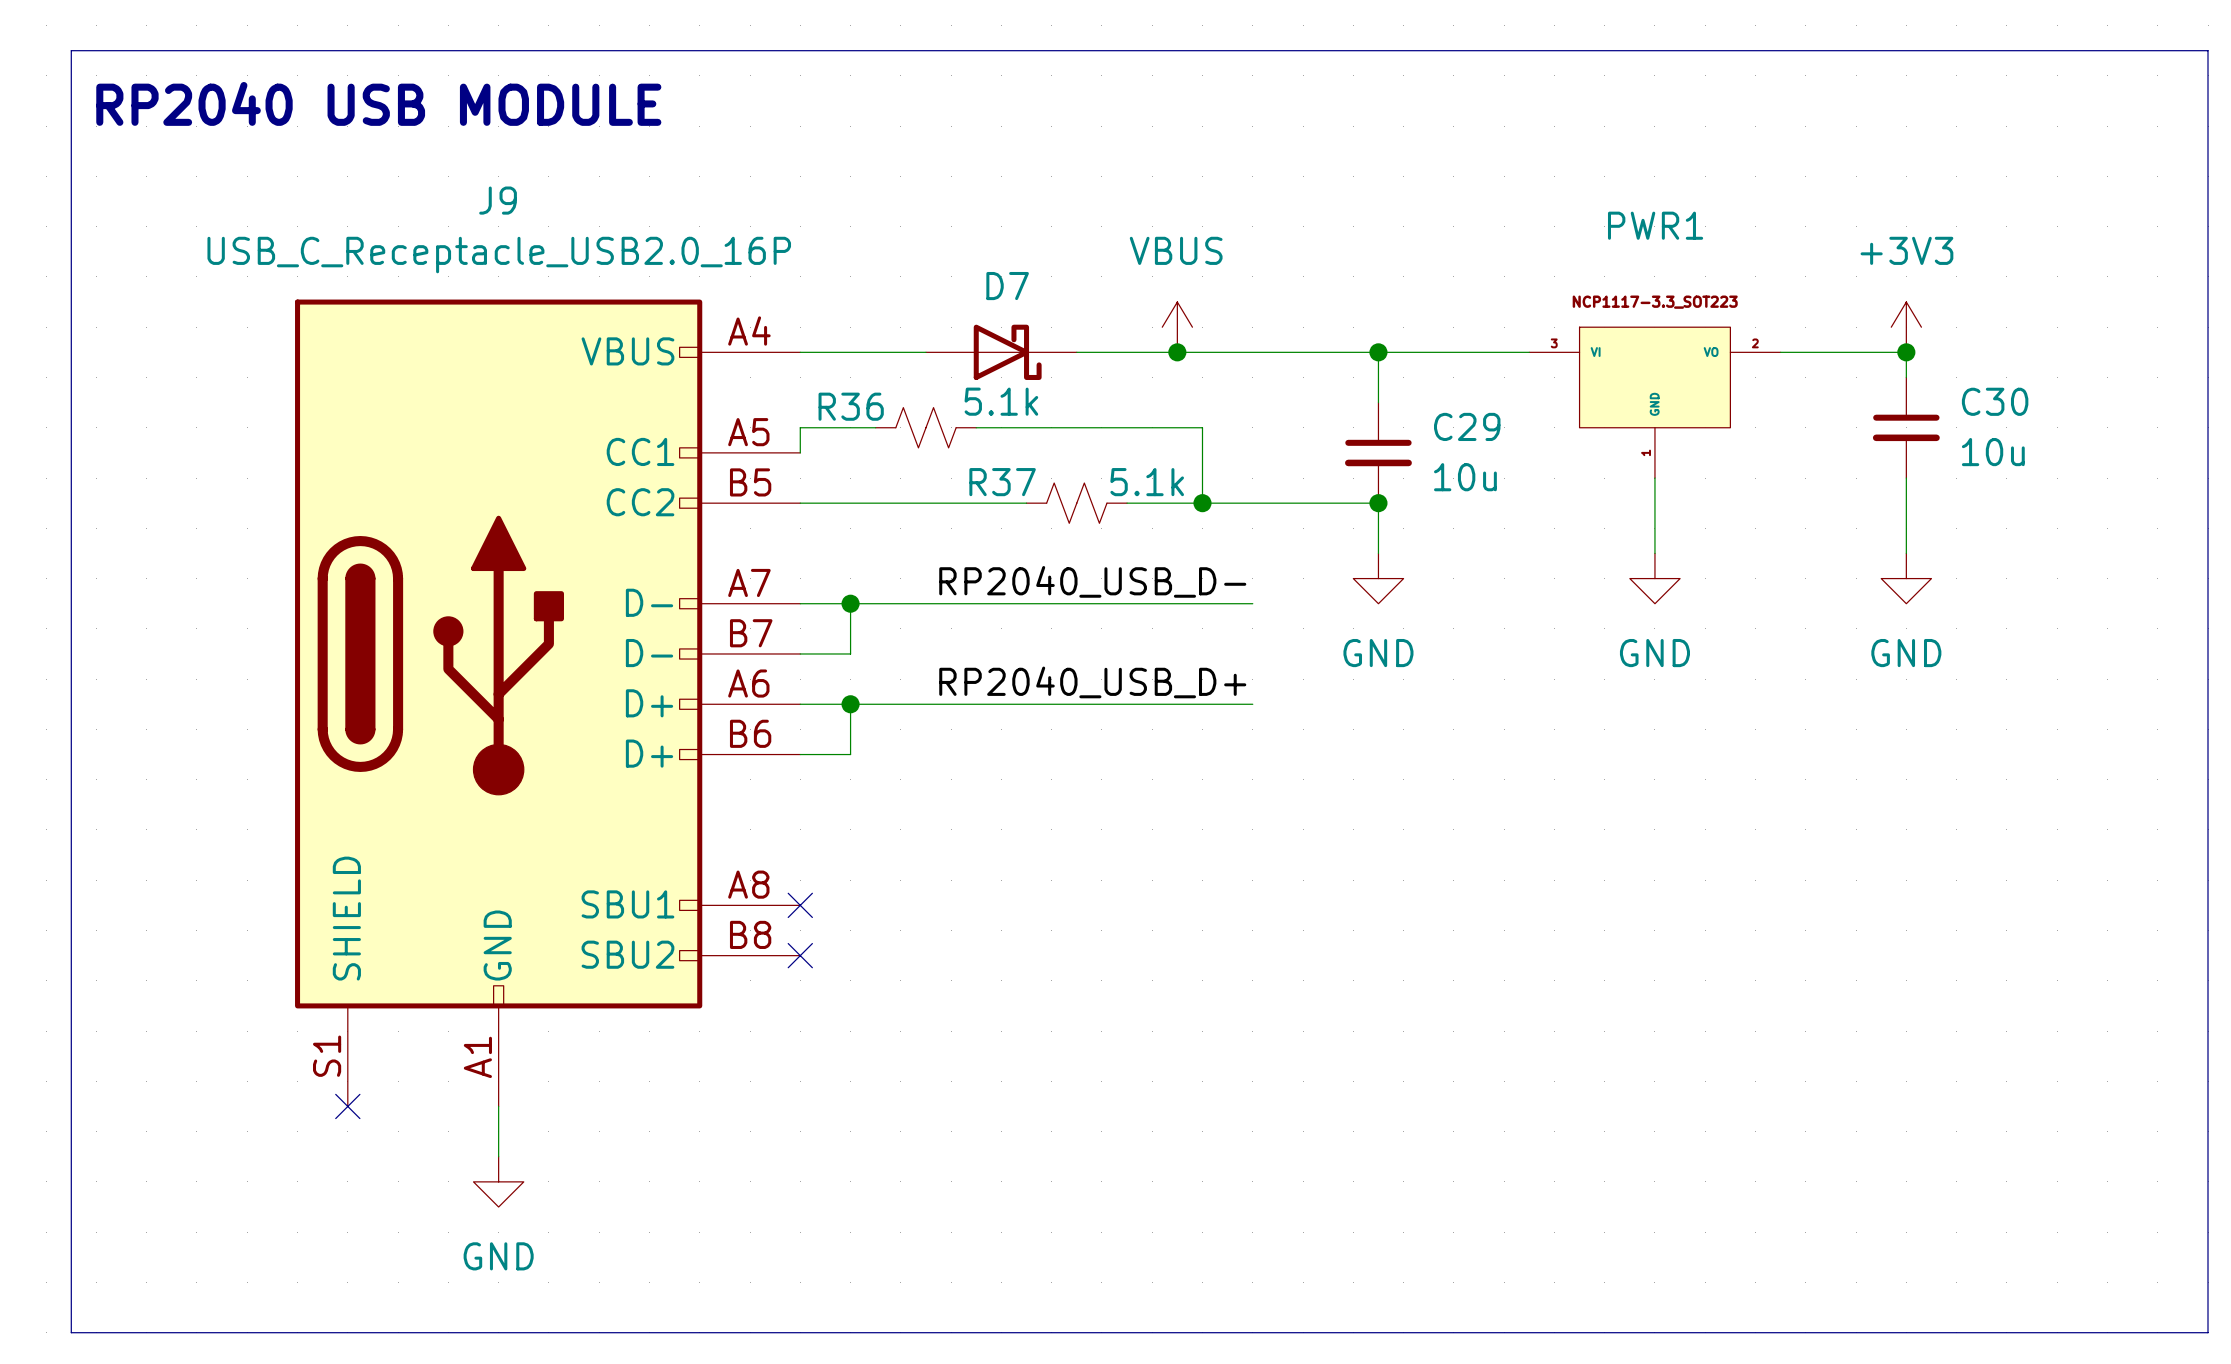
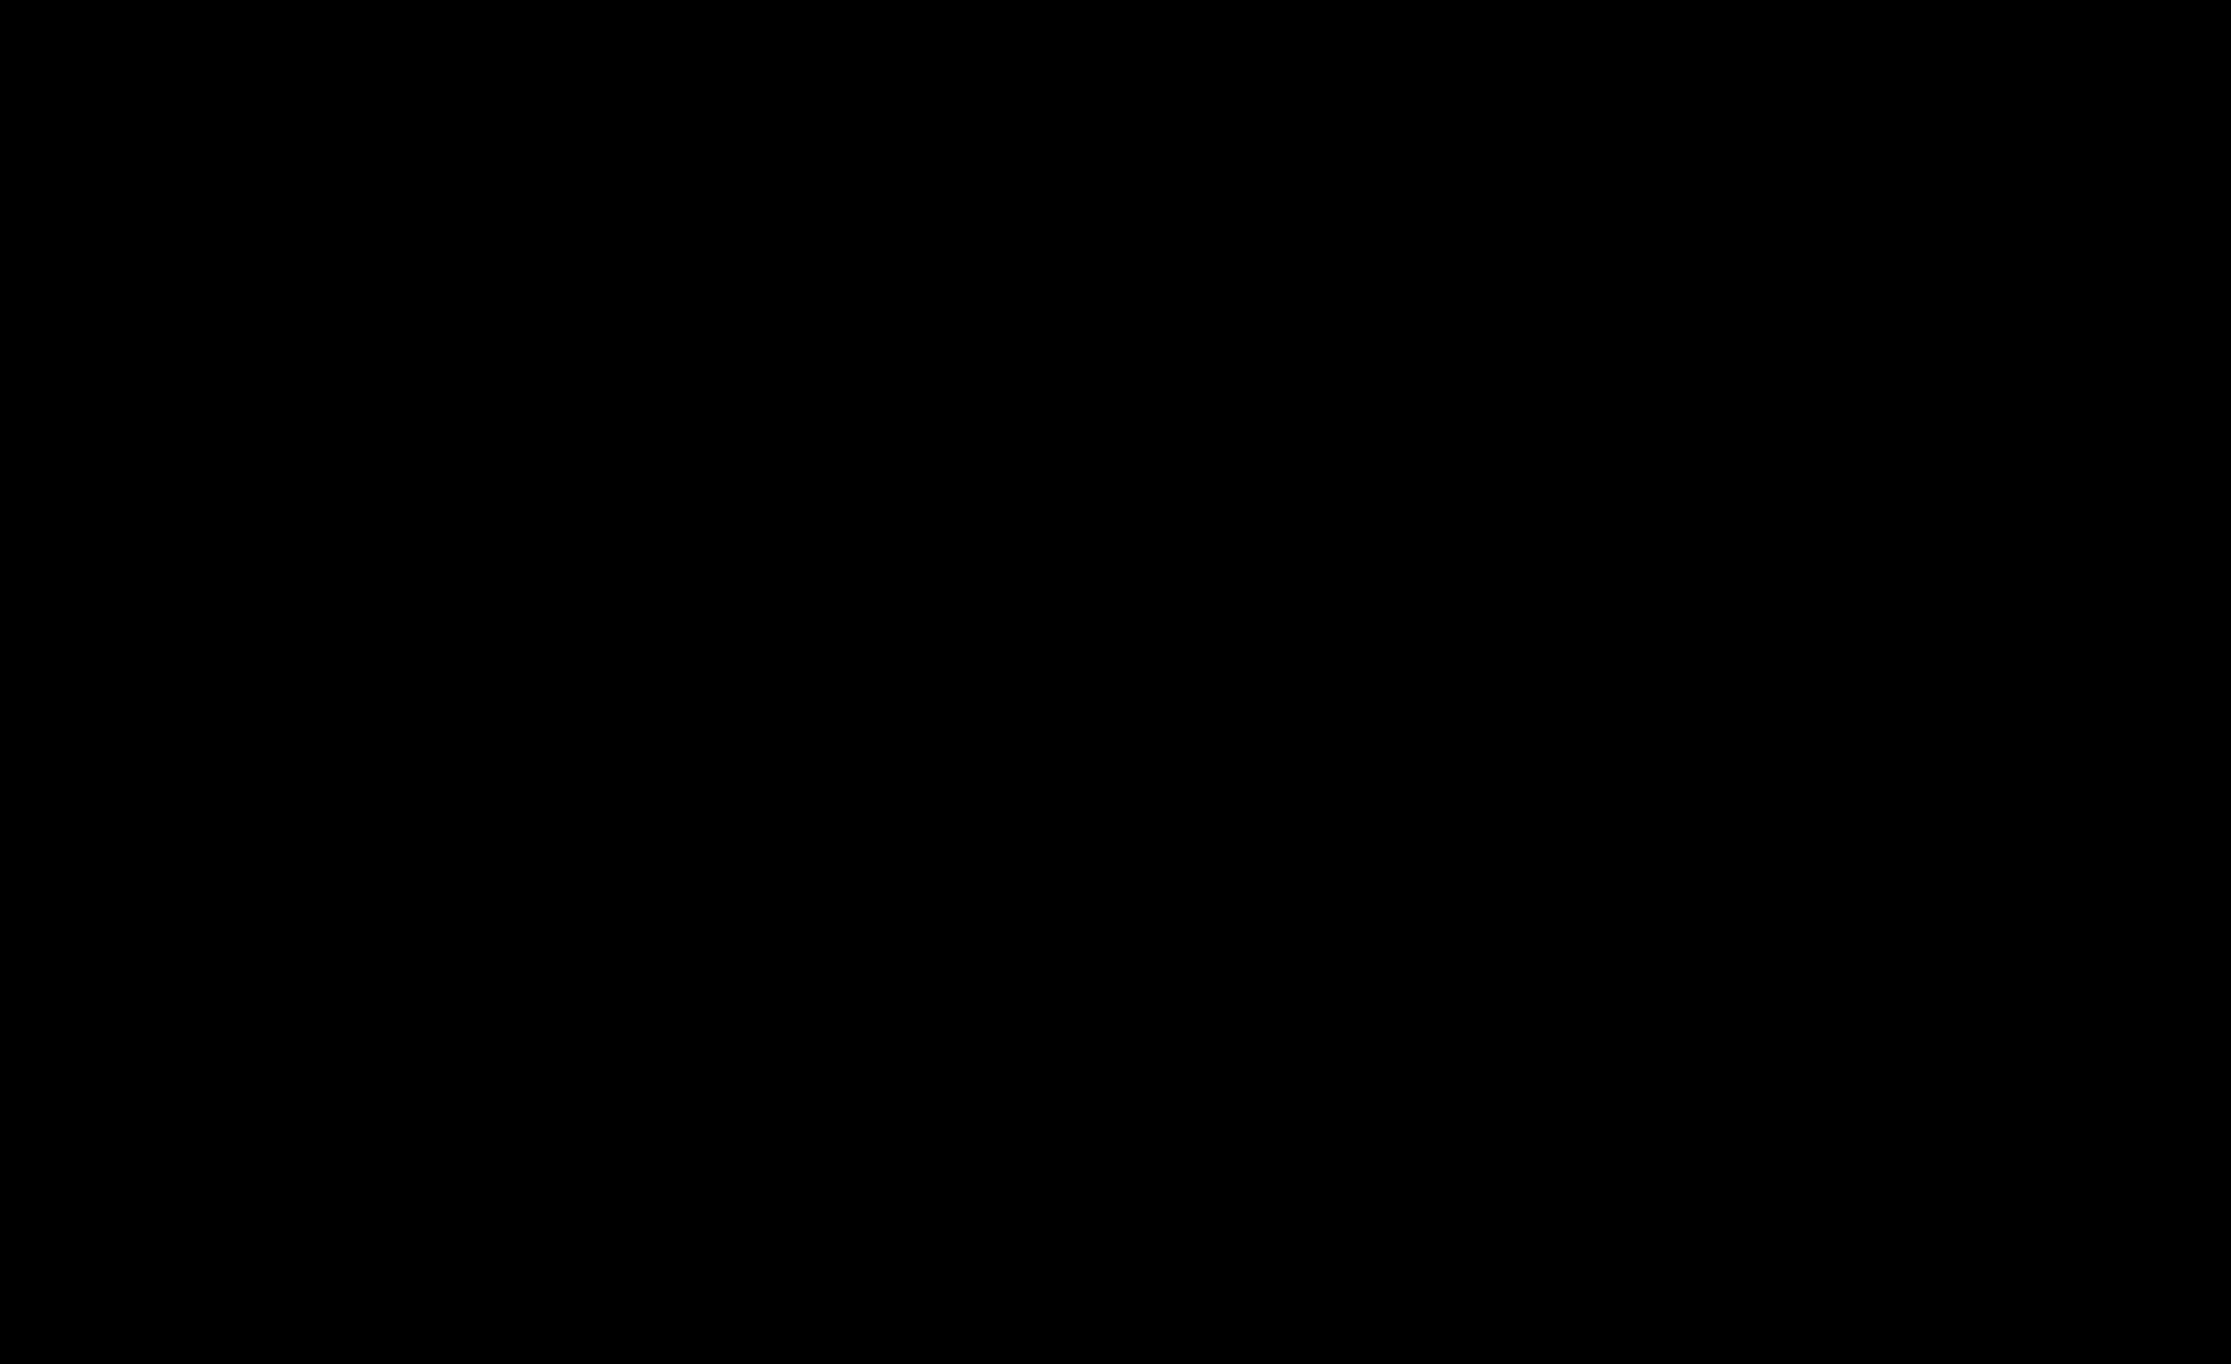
line: (71, 50) (71, 1332) (2208, 1332) (2208, 50) (71, 50) -> none
text: RP2040 USB MODULE (378, 103) -> none
power symbol: VBUS (1177, 327) -> none
power symbol: +3V3 (1906, 327) -> none
wire: (800, 352) (925, 352) -> none
D7: (1001, 352) -> none
wire: (1076, 352) (1529, 352) -> none
junction: (1177, 352) -> none
wire: (1378, 352) (1378, 402) -> none
junction: (1378, 352) -> none
wire: (1780, 352) (1906, 352) (1906, 377) -> none
junction: (1906, 352) -> none
PWR1: (1654, 402) -> none
wire: (875, 427) (800, 427) (800, 452) -> none
R36: 5.1k (925, 427) -> none
wire: (976, 427) (1202, 427) (1202, 503) -> none
C30: 10u (1906, 427) -> none
C29: 10u (1378, 452) -> none
wire: (1654, 478) (1654, 553) -> none
wire: (1906, 478) (1906, 553) -> none
wire: (800, 503) (1026, 503) -> none
R37: 5.1k (1076, 503) -> none
wire: (1127, 503) (1378, 503) (1378, 553) -> none
junction: (1202, 503) -> none
junction: (1378, 503) -> none
power symbol: GND (1378, 578) -> none
power symbol: GND (1654, 578) -> none
power symbol: GND (1906, 578) -> none
label: RP2040_USB_D- (1092, 581) -> none
wire: (800, 603) (1252, 603) -> none
wire: (850, 603) (850, 653) (800, 653) -> none
junction: (850, 603) -> none
label: RP2040_USB_D+ (1092, 682) -> none
J9: USB_C_Receptacle_USB2.0_16P (547, 703) -> none
wire: (800, 704) (1252, 704) -> none
wire: (850, 704) (850, 754) (800, 754) -> none
junction: (850, 704) -> none
no-connect mark: (800, 905) -> none
no-connect mark: (800, 955) -> none
no-connect mark: (347, 1106) -> none
wire: (498, 1106) (498, 1156) -> none
power symbol: GND (498, 1181) -> none

